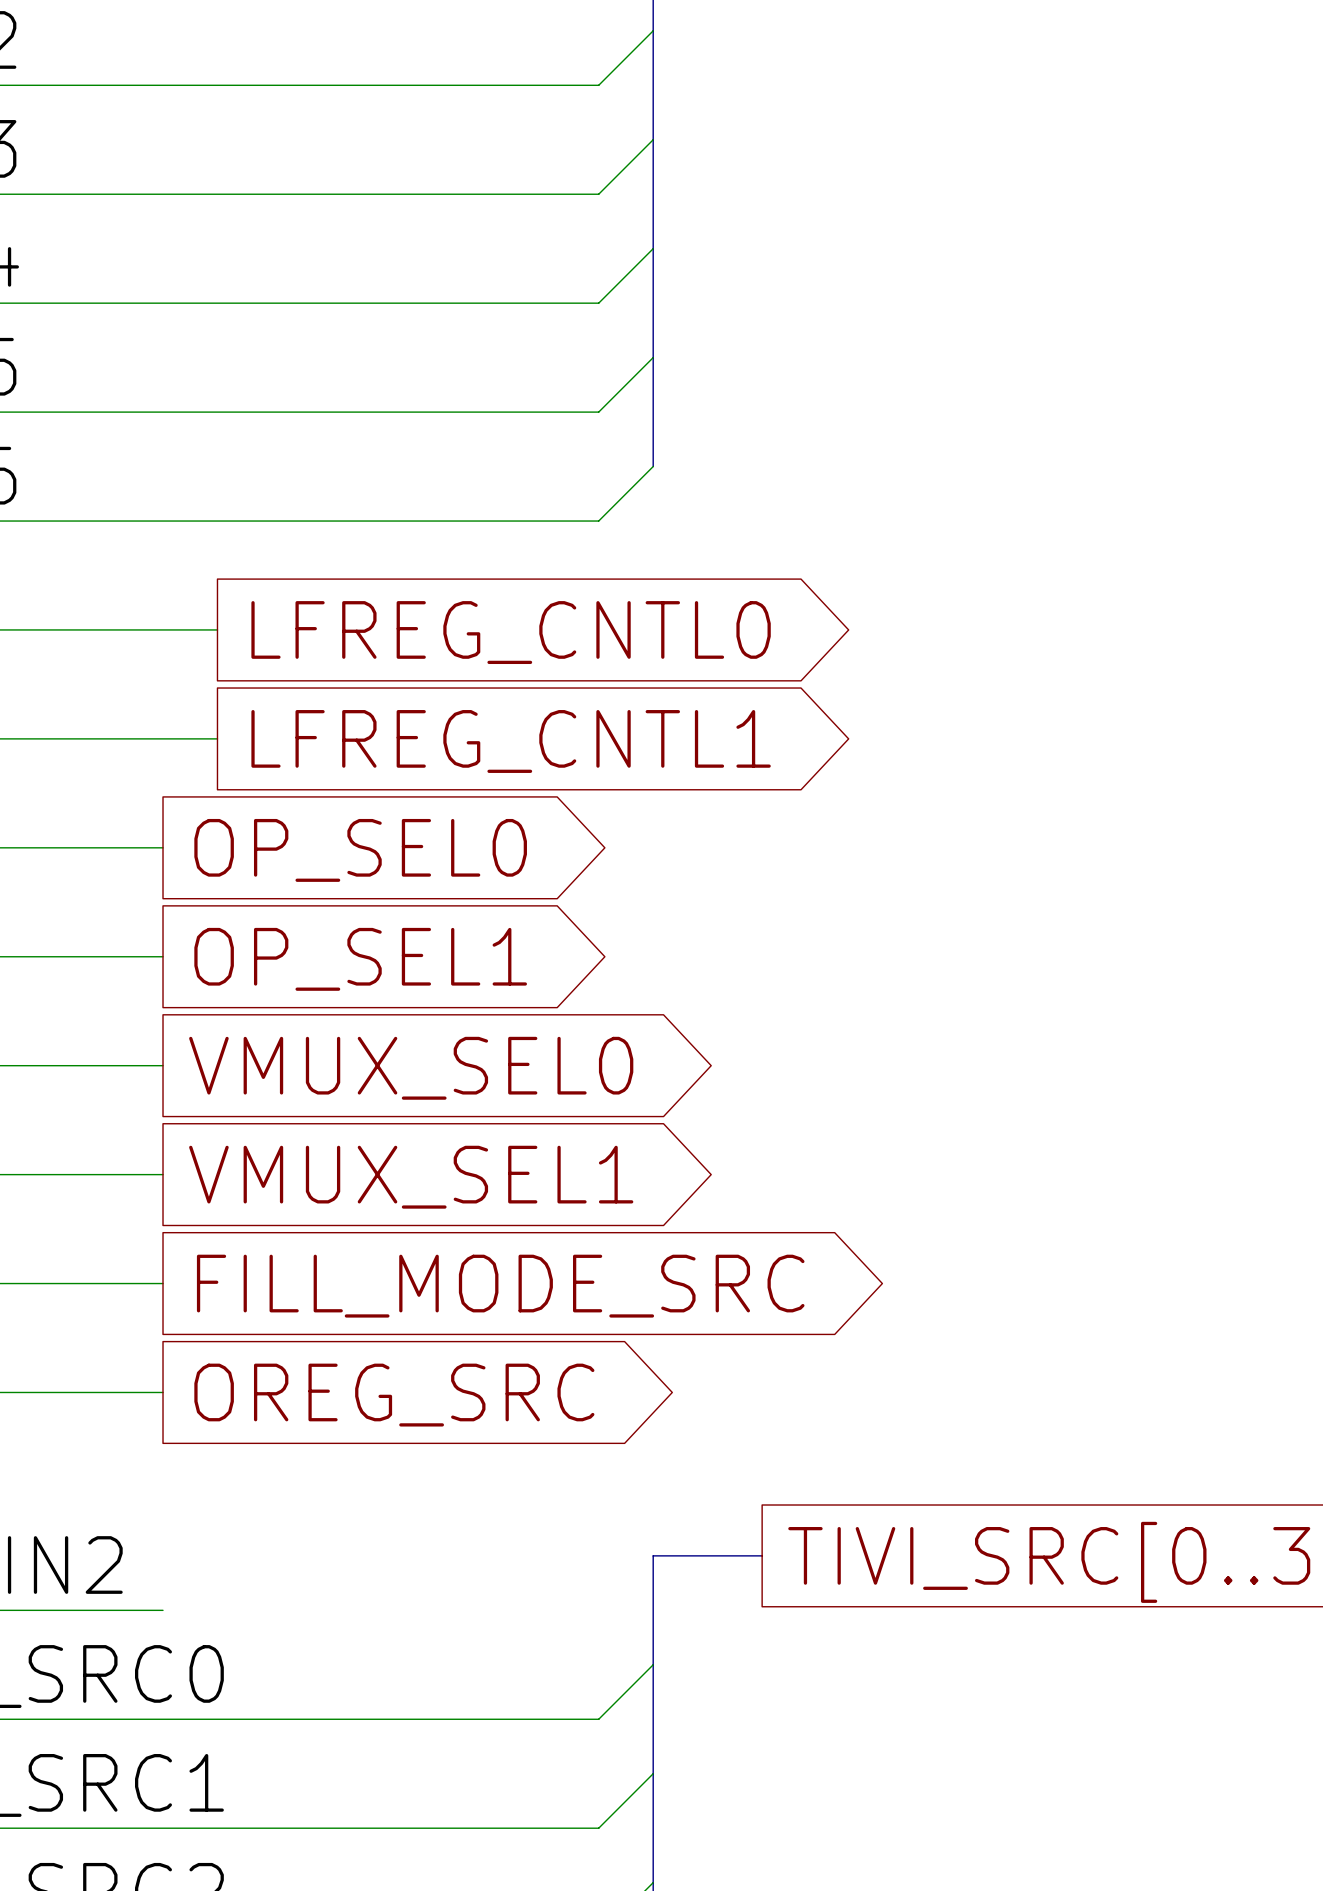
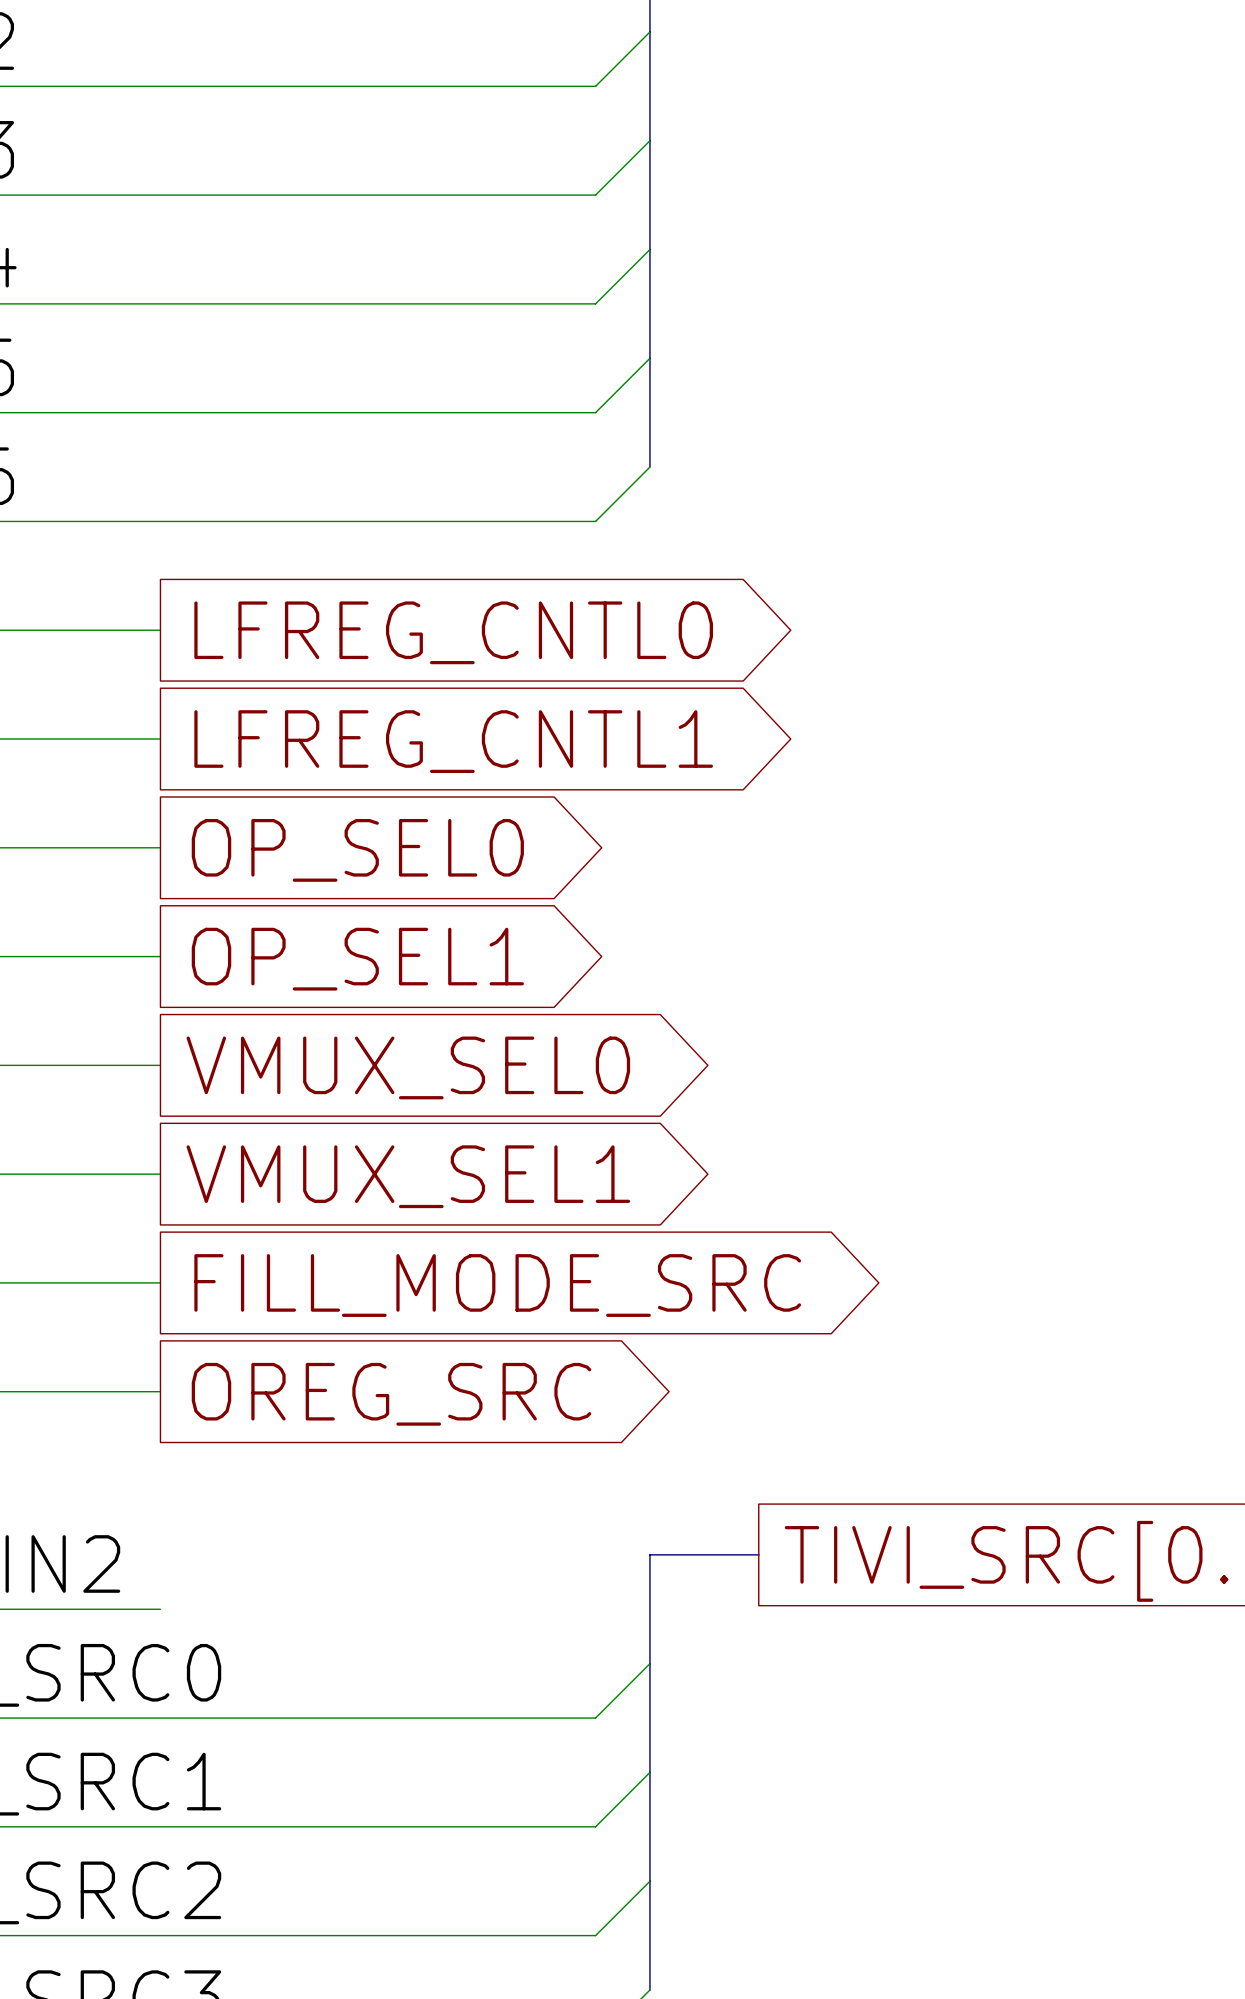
wire: (163, 629) (217, 629) -> none
global label position: LFREG_CNTL0 (511, 632) -> LFREG_CNTL0 (453, 632)
wire: (163, 738) (217, 738) -> none
global label position: LFREG_CNTL1 (511, 741) -> LFREG_CNTL1 (453, 741)

